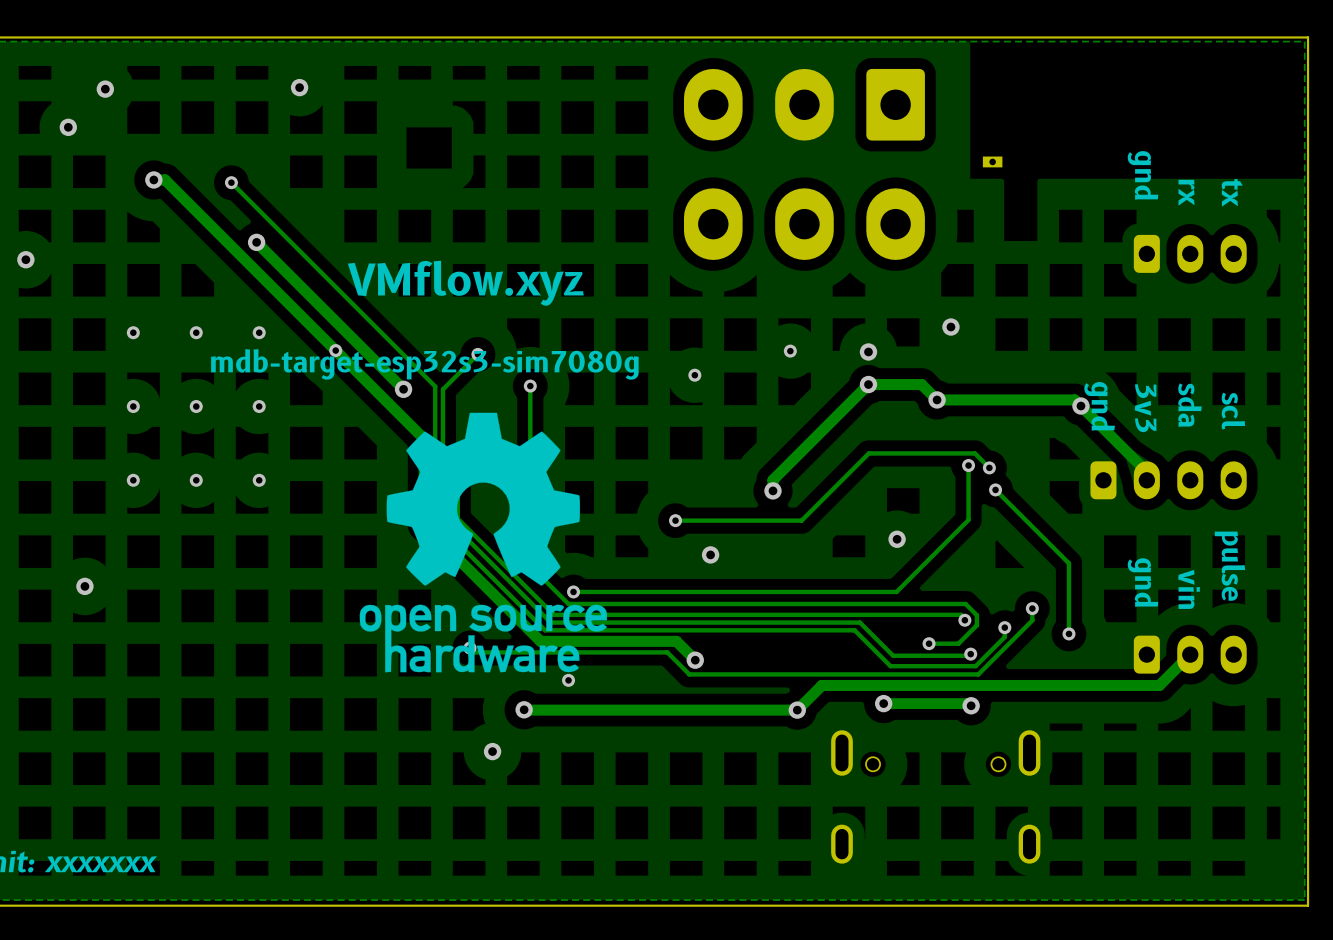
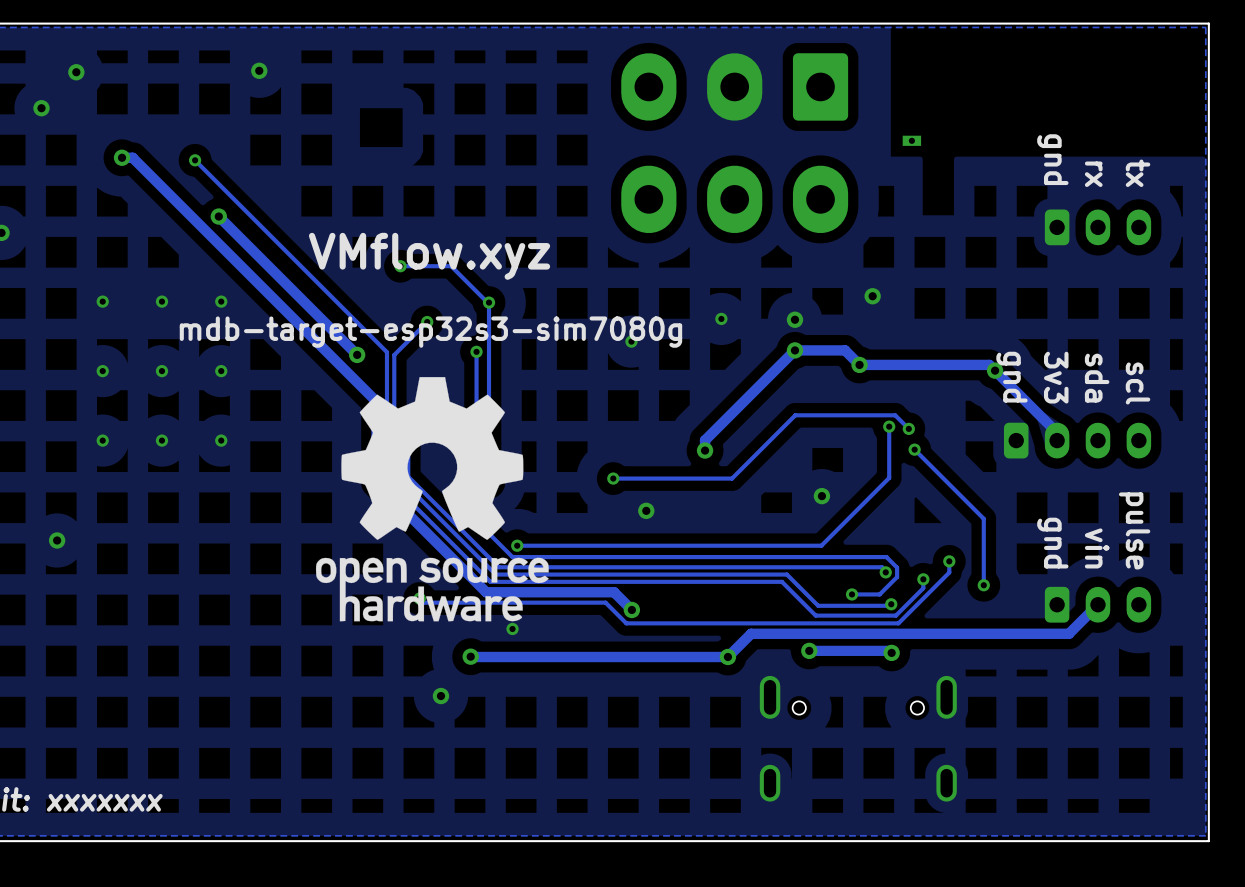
track: none -> (400, 266) (451, 266) (489, 302) (489, 482)
via: none -> (400, 266)
via: none -> (489, 302)
via: (335, 350) -> none

